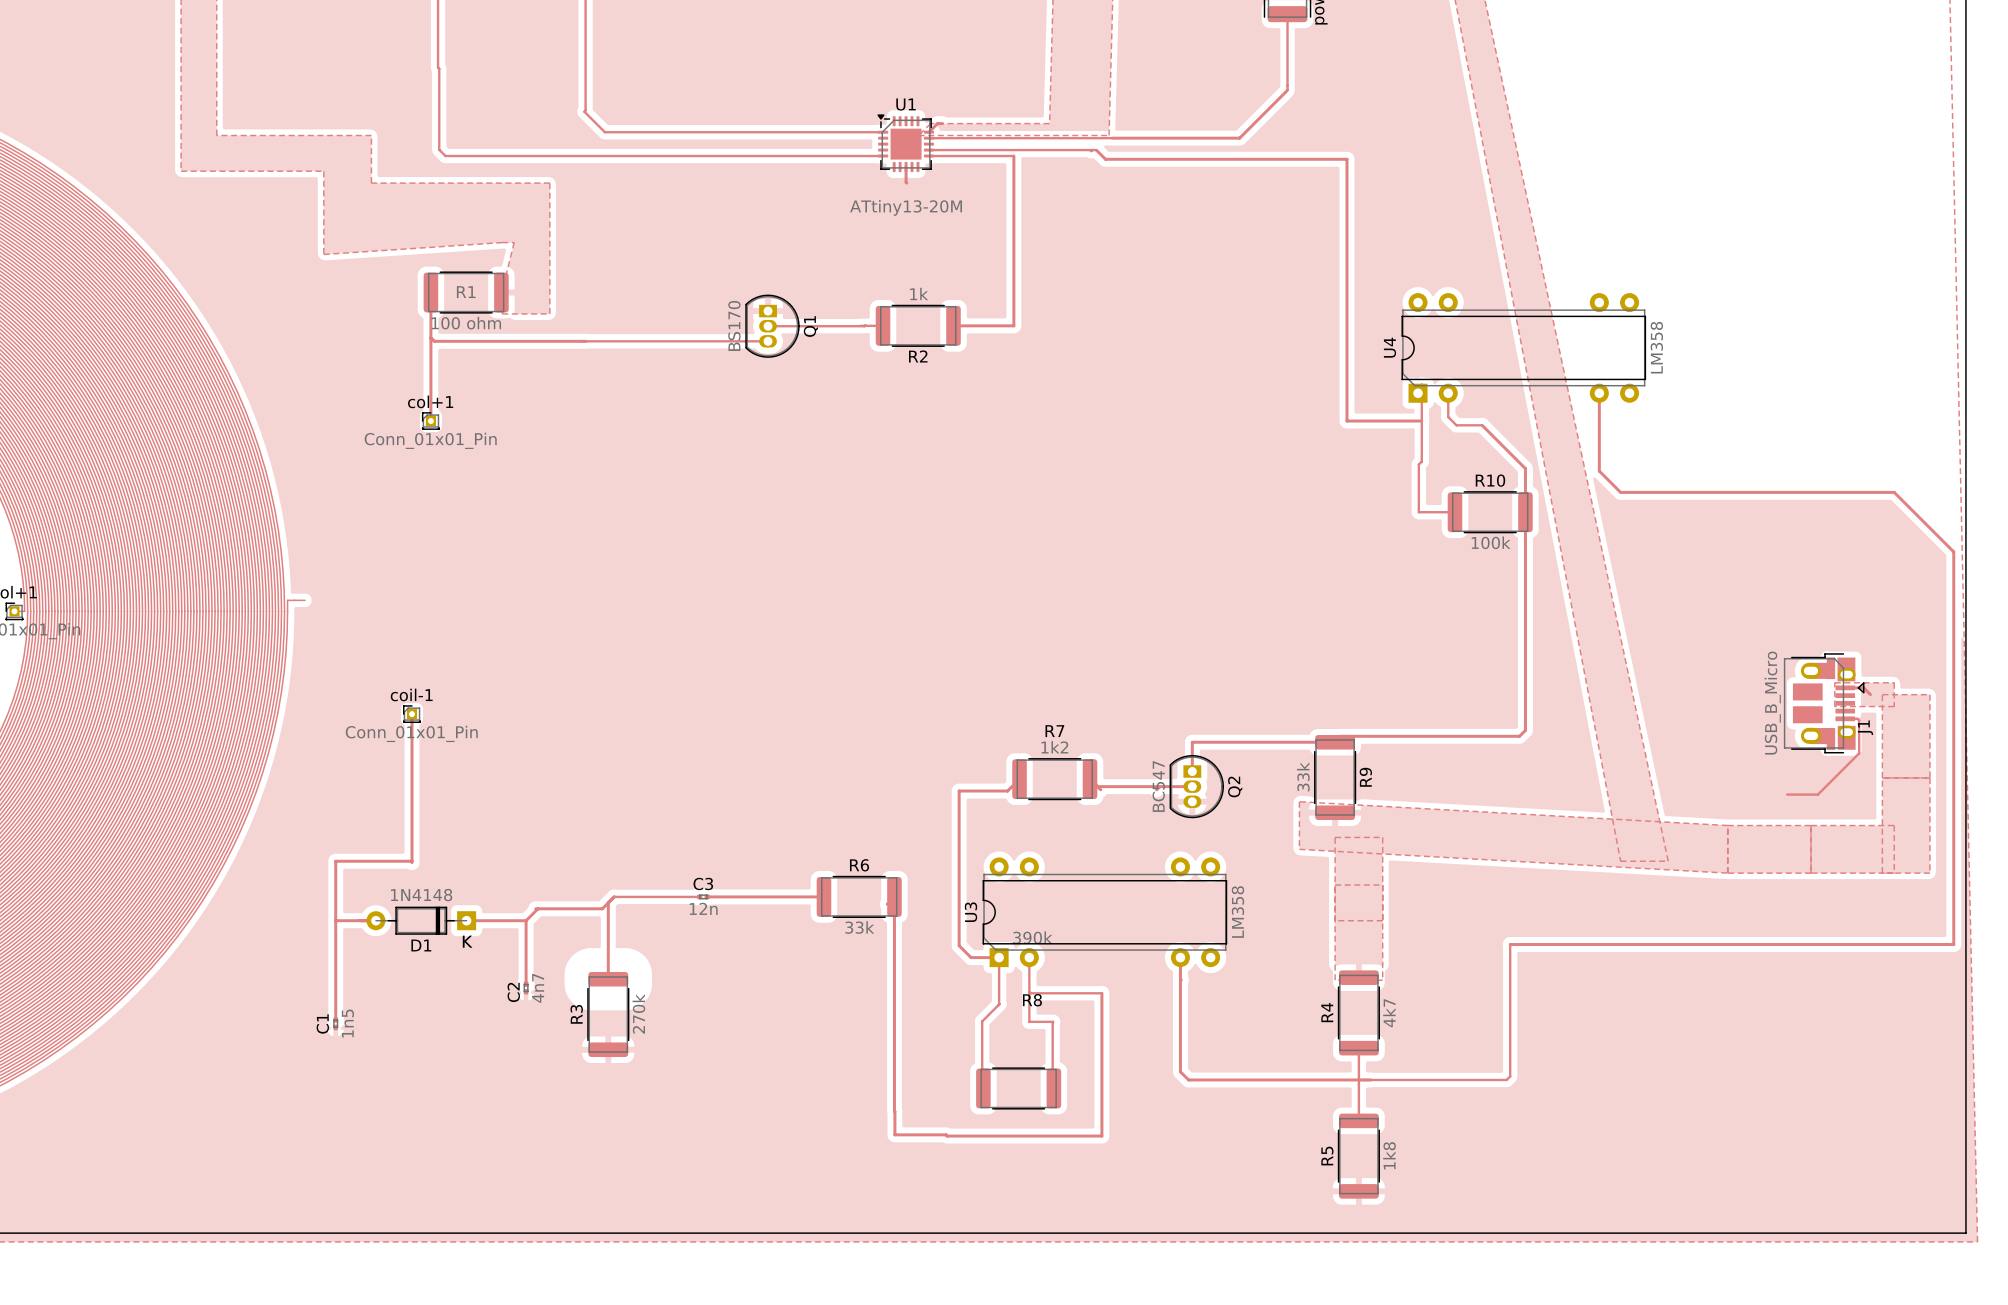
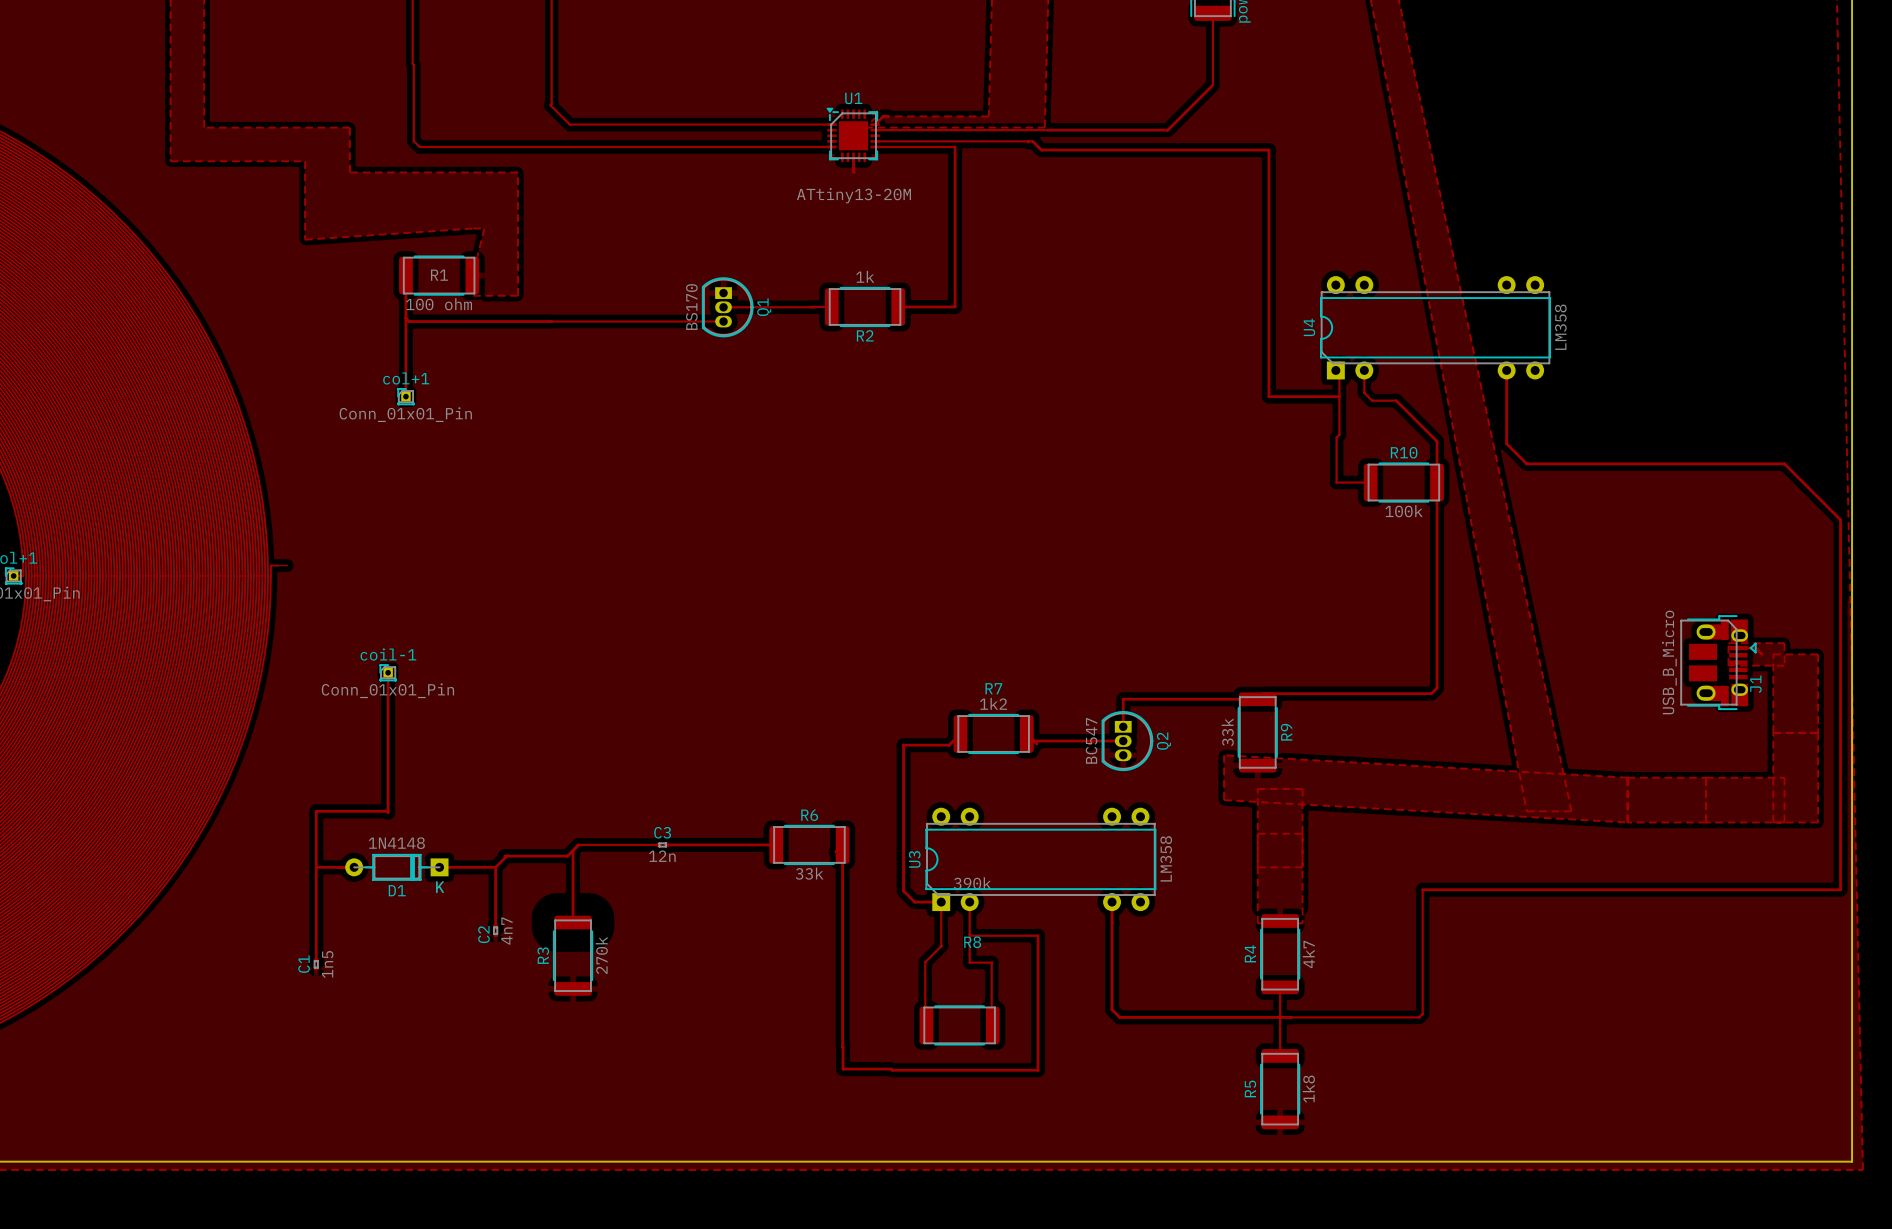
track: (1845, 718) (1859, 720) (1859, 753) (1817, 794) (1787, 794) -> none

